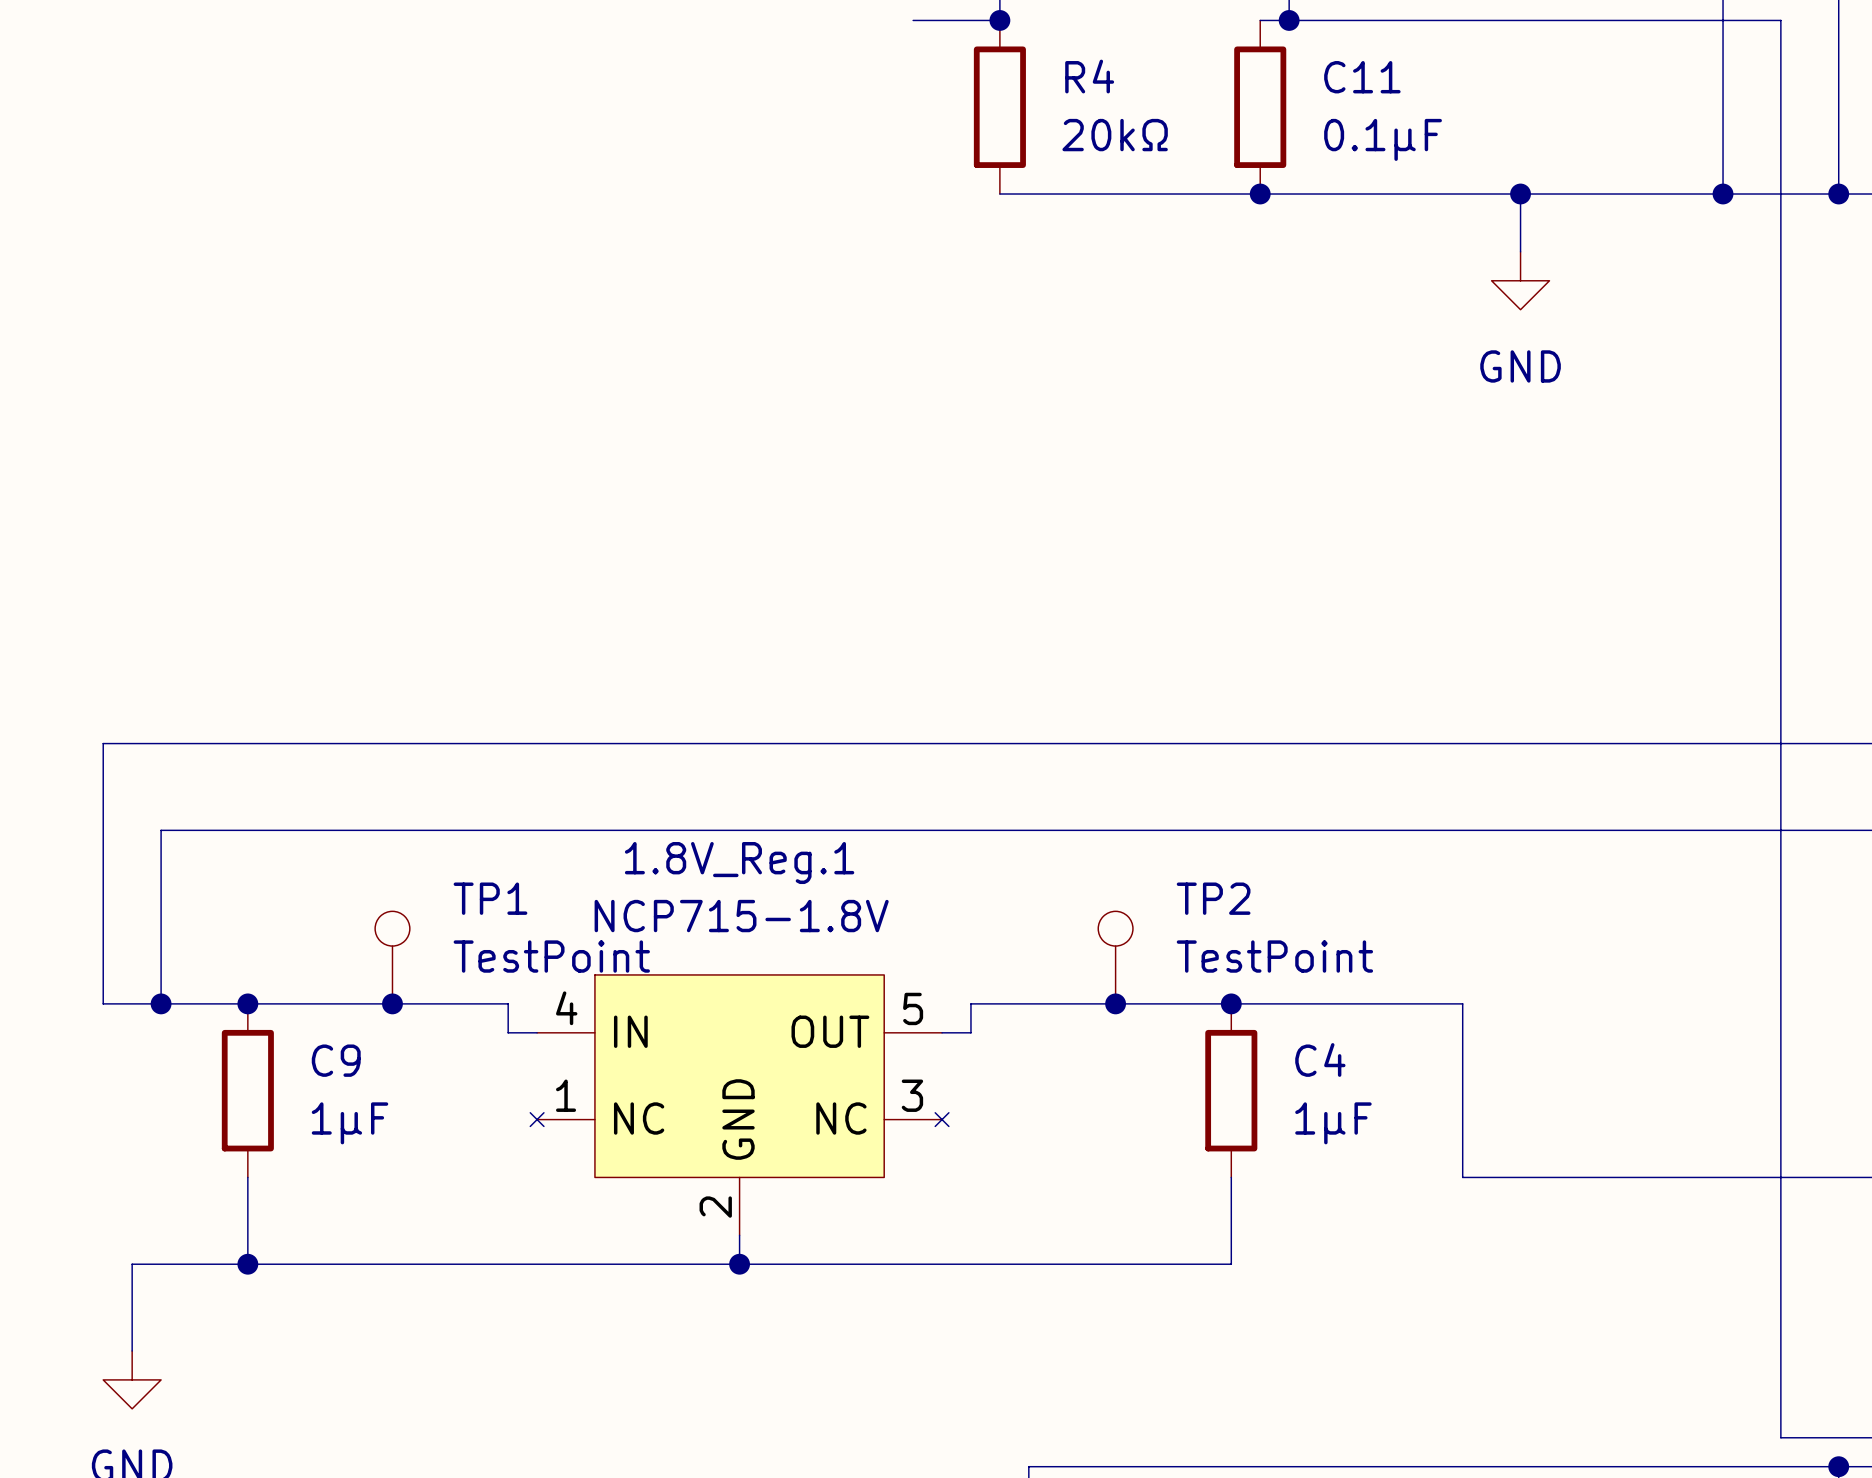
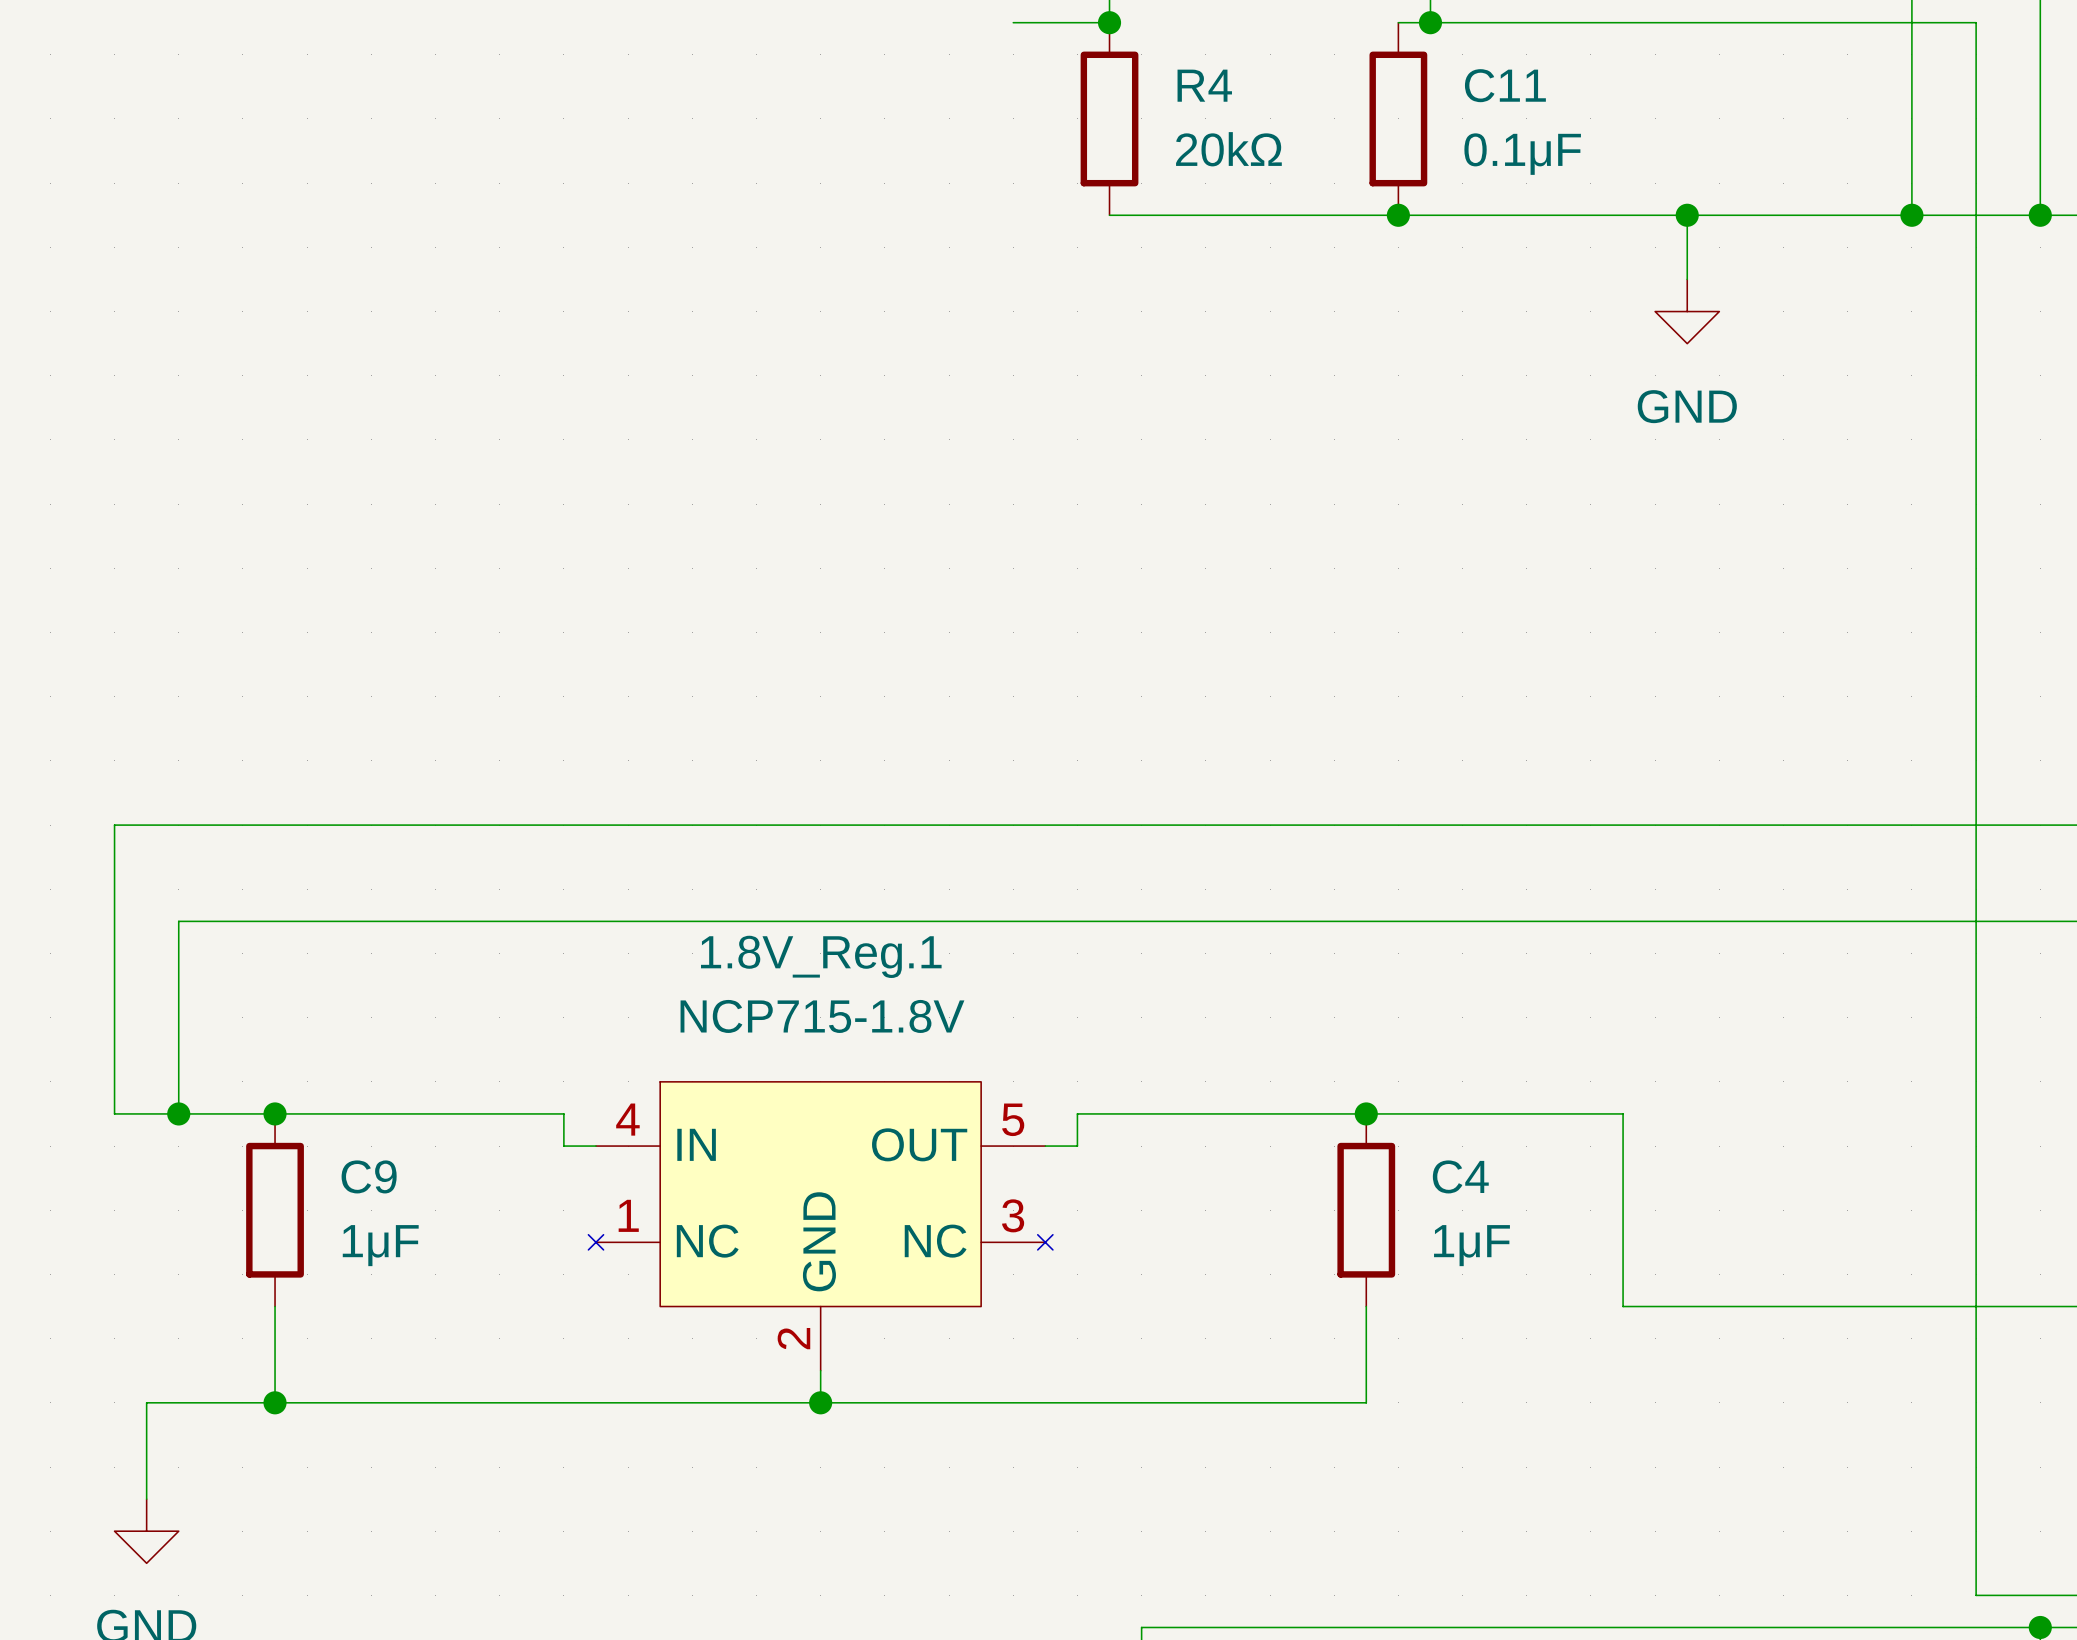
TP1: TestPoint (392, 957) -> none
TP2: TestPoint (1115, 957) -> none
junction: (392, 1003) -> none
junction: (1115, 1003) -> none

